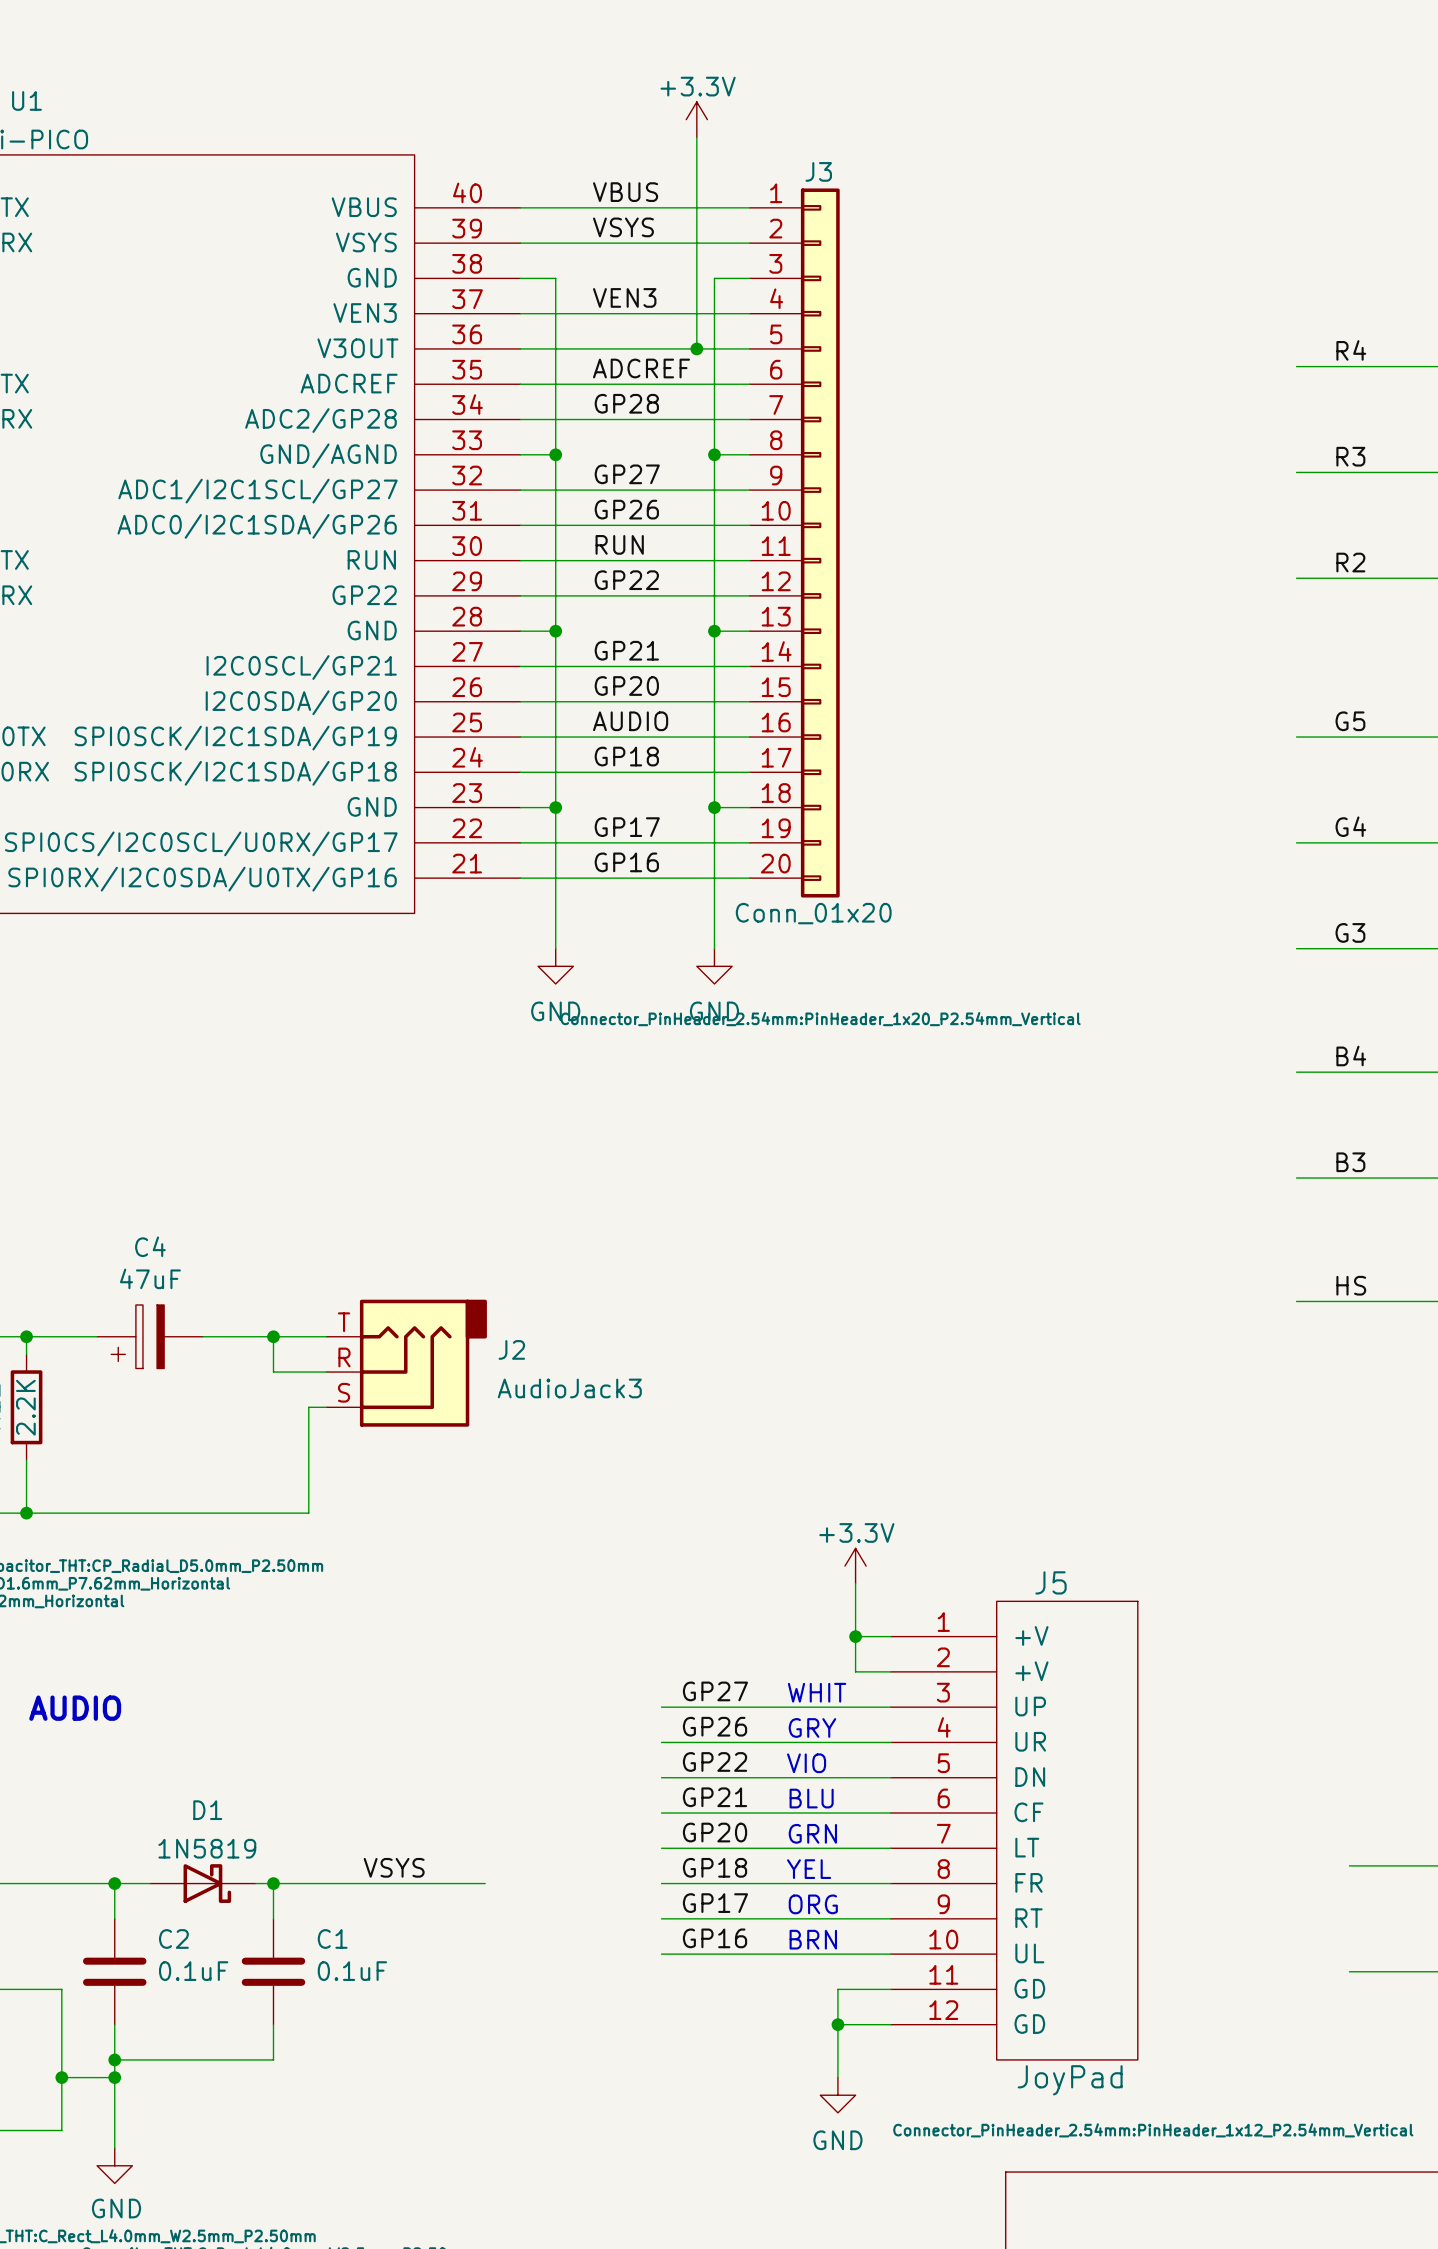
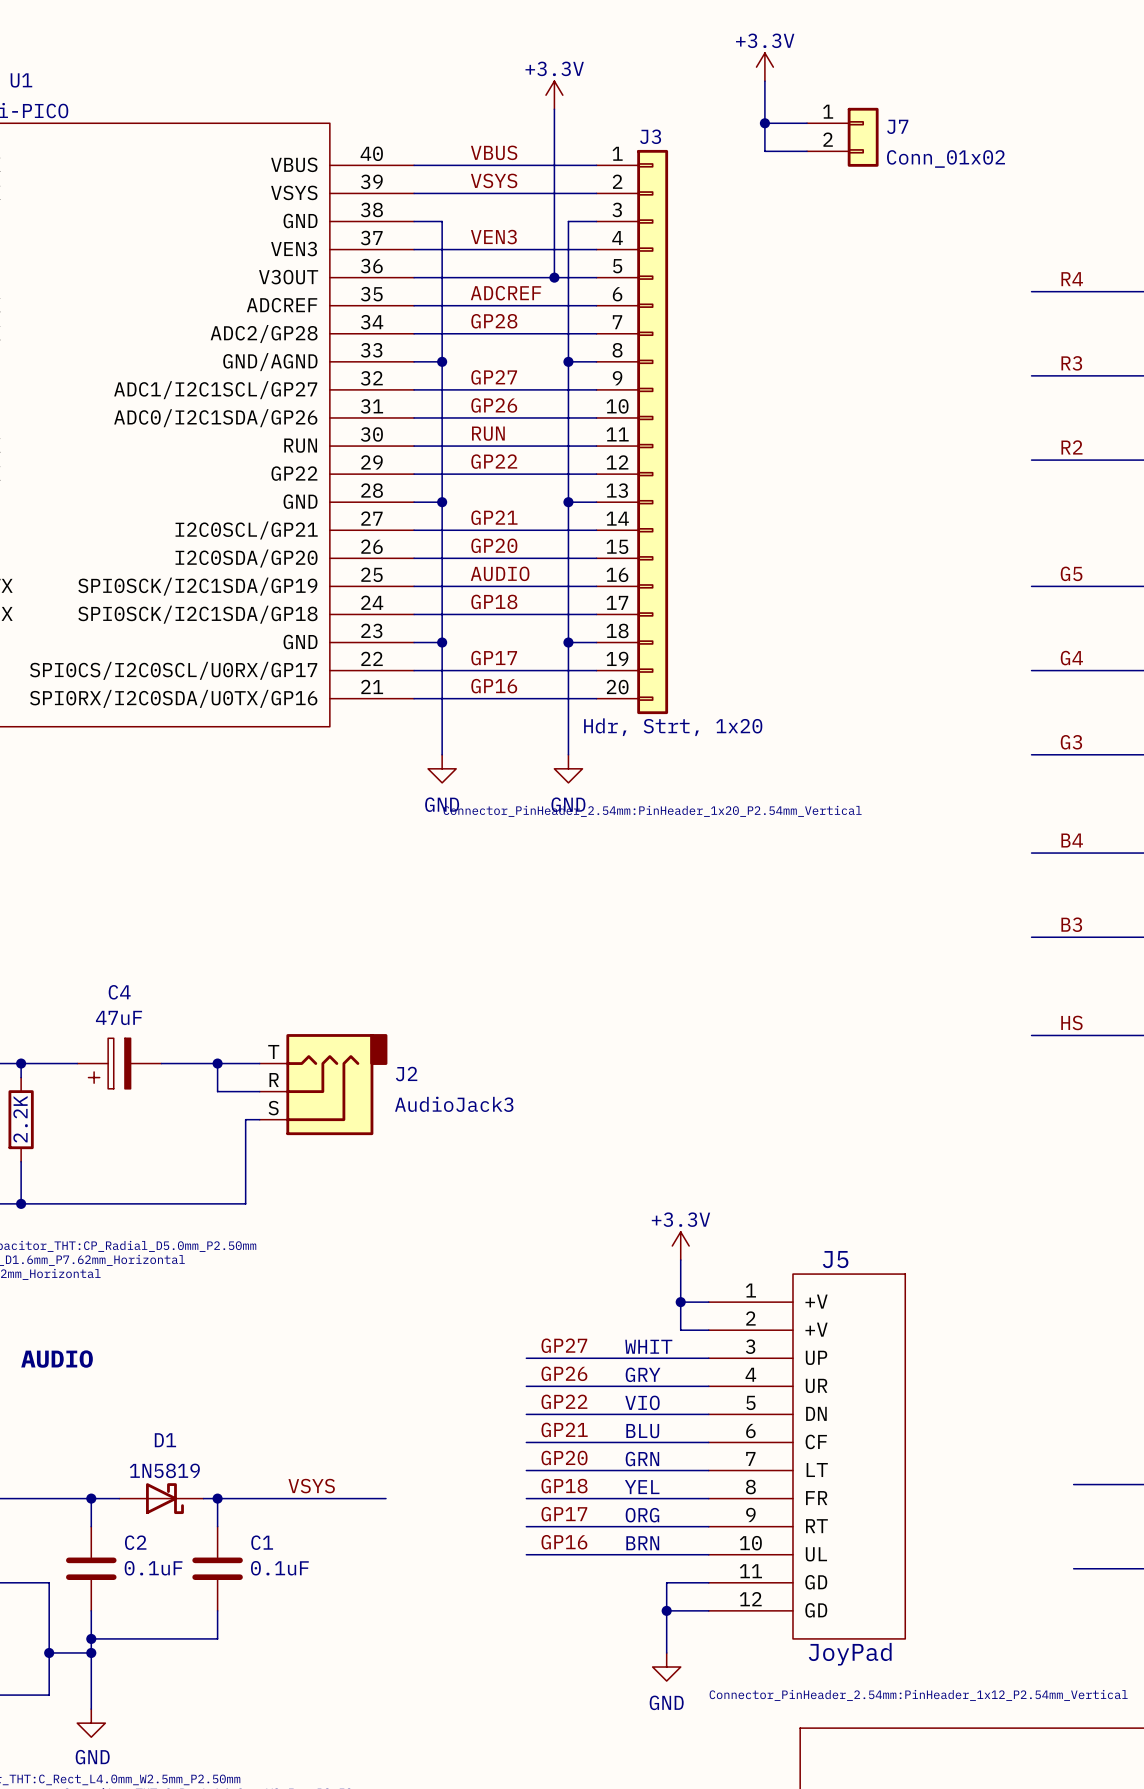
power symbol: none -> +3.3V (764, 67)
wire: none -> (764, 81) (764, 151) (807, 151)
wire: none -> (764, 123) (807, 123)
junction: none -> (764, 123)
J7: none -> Conn_01x02 (842, 137)
J3 value: Conn_01x20 (813, 913) -> Hdr, Strt, 1x20 (673, 727)

